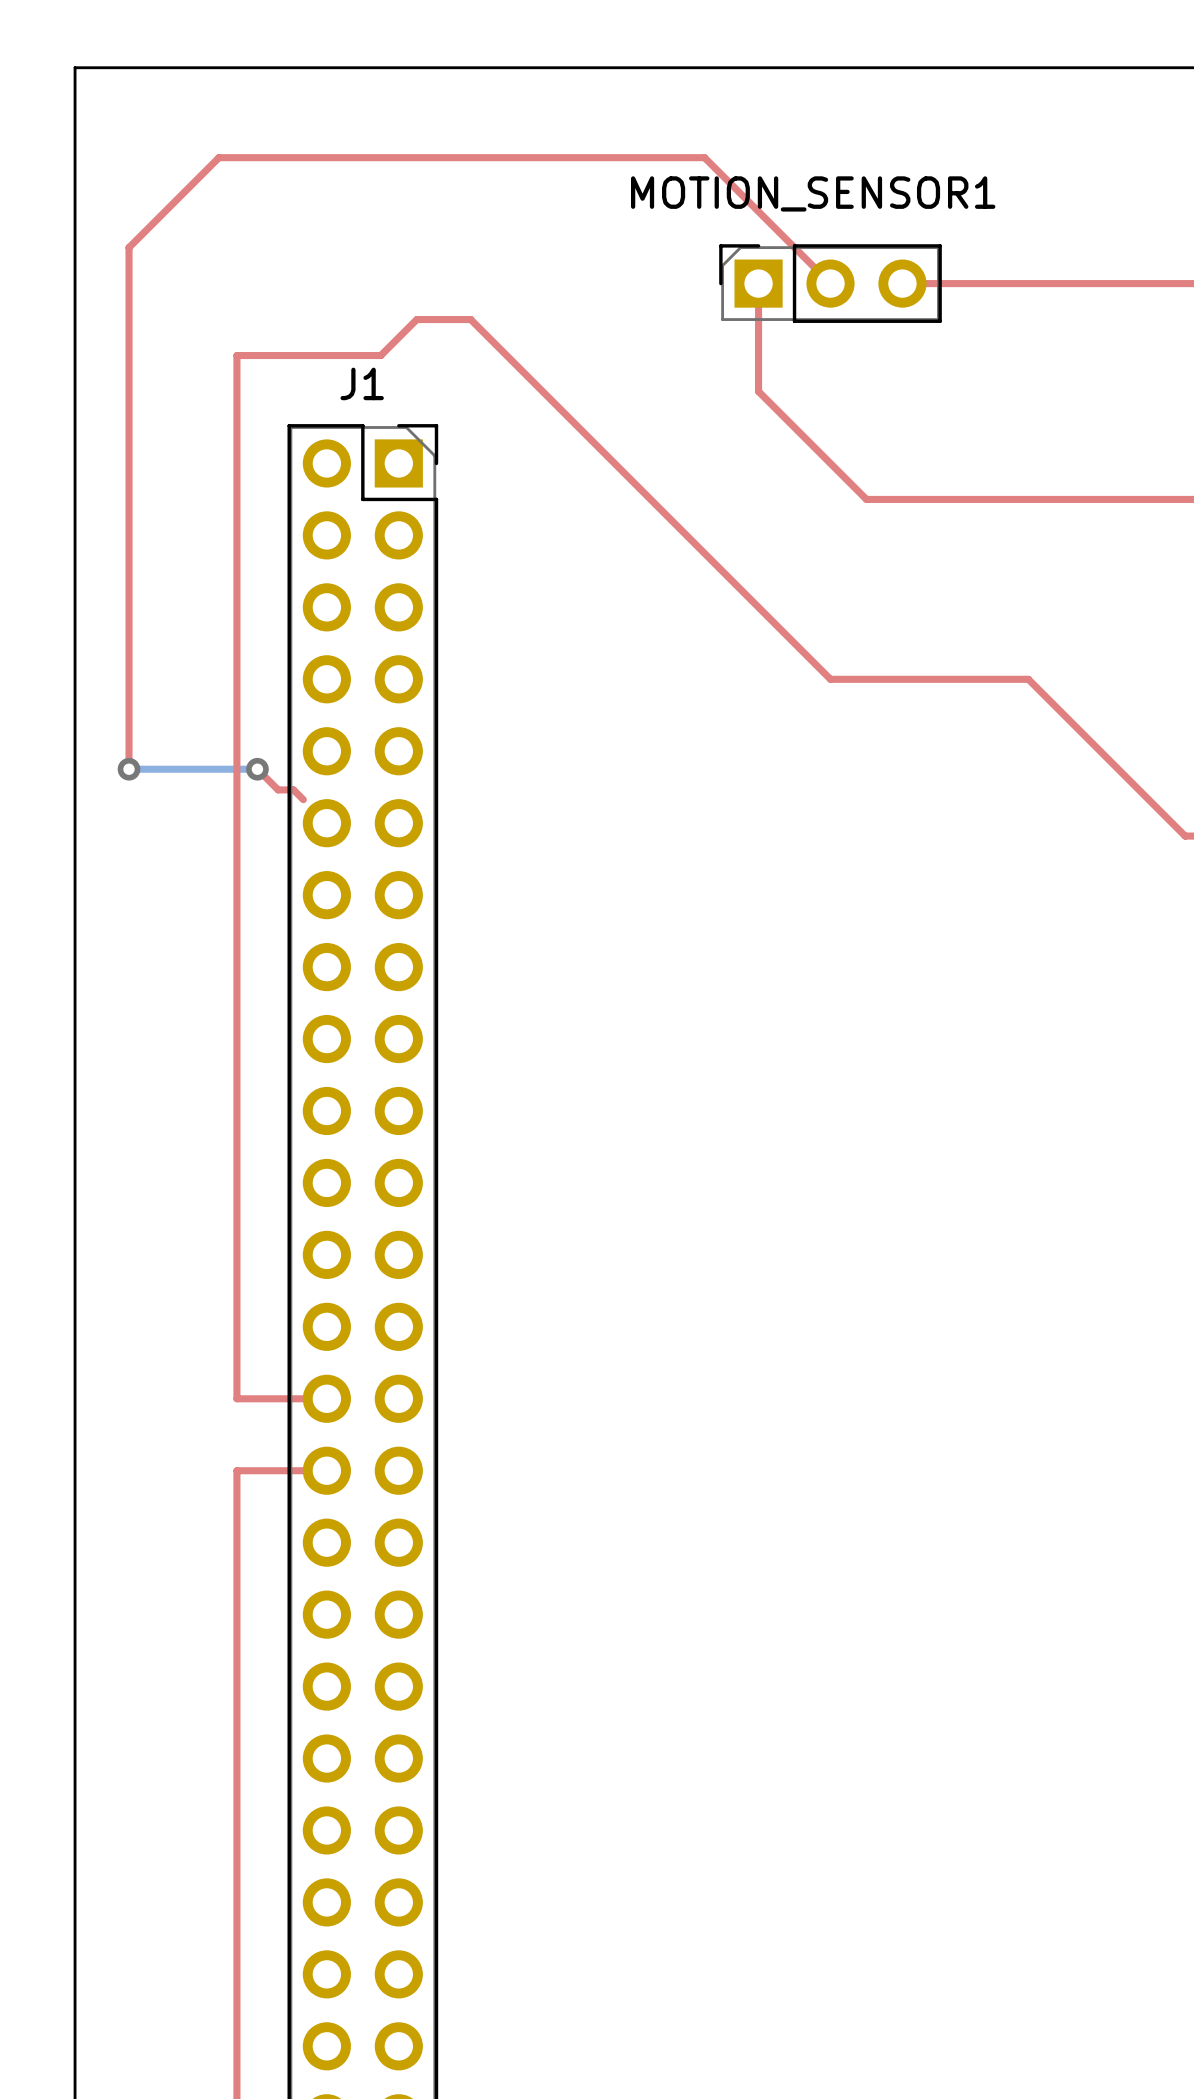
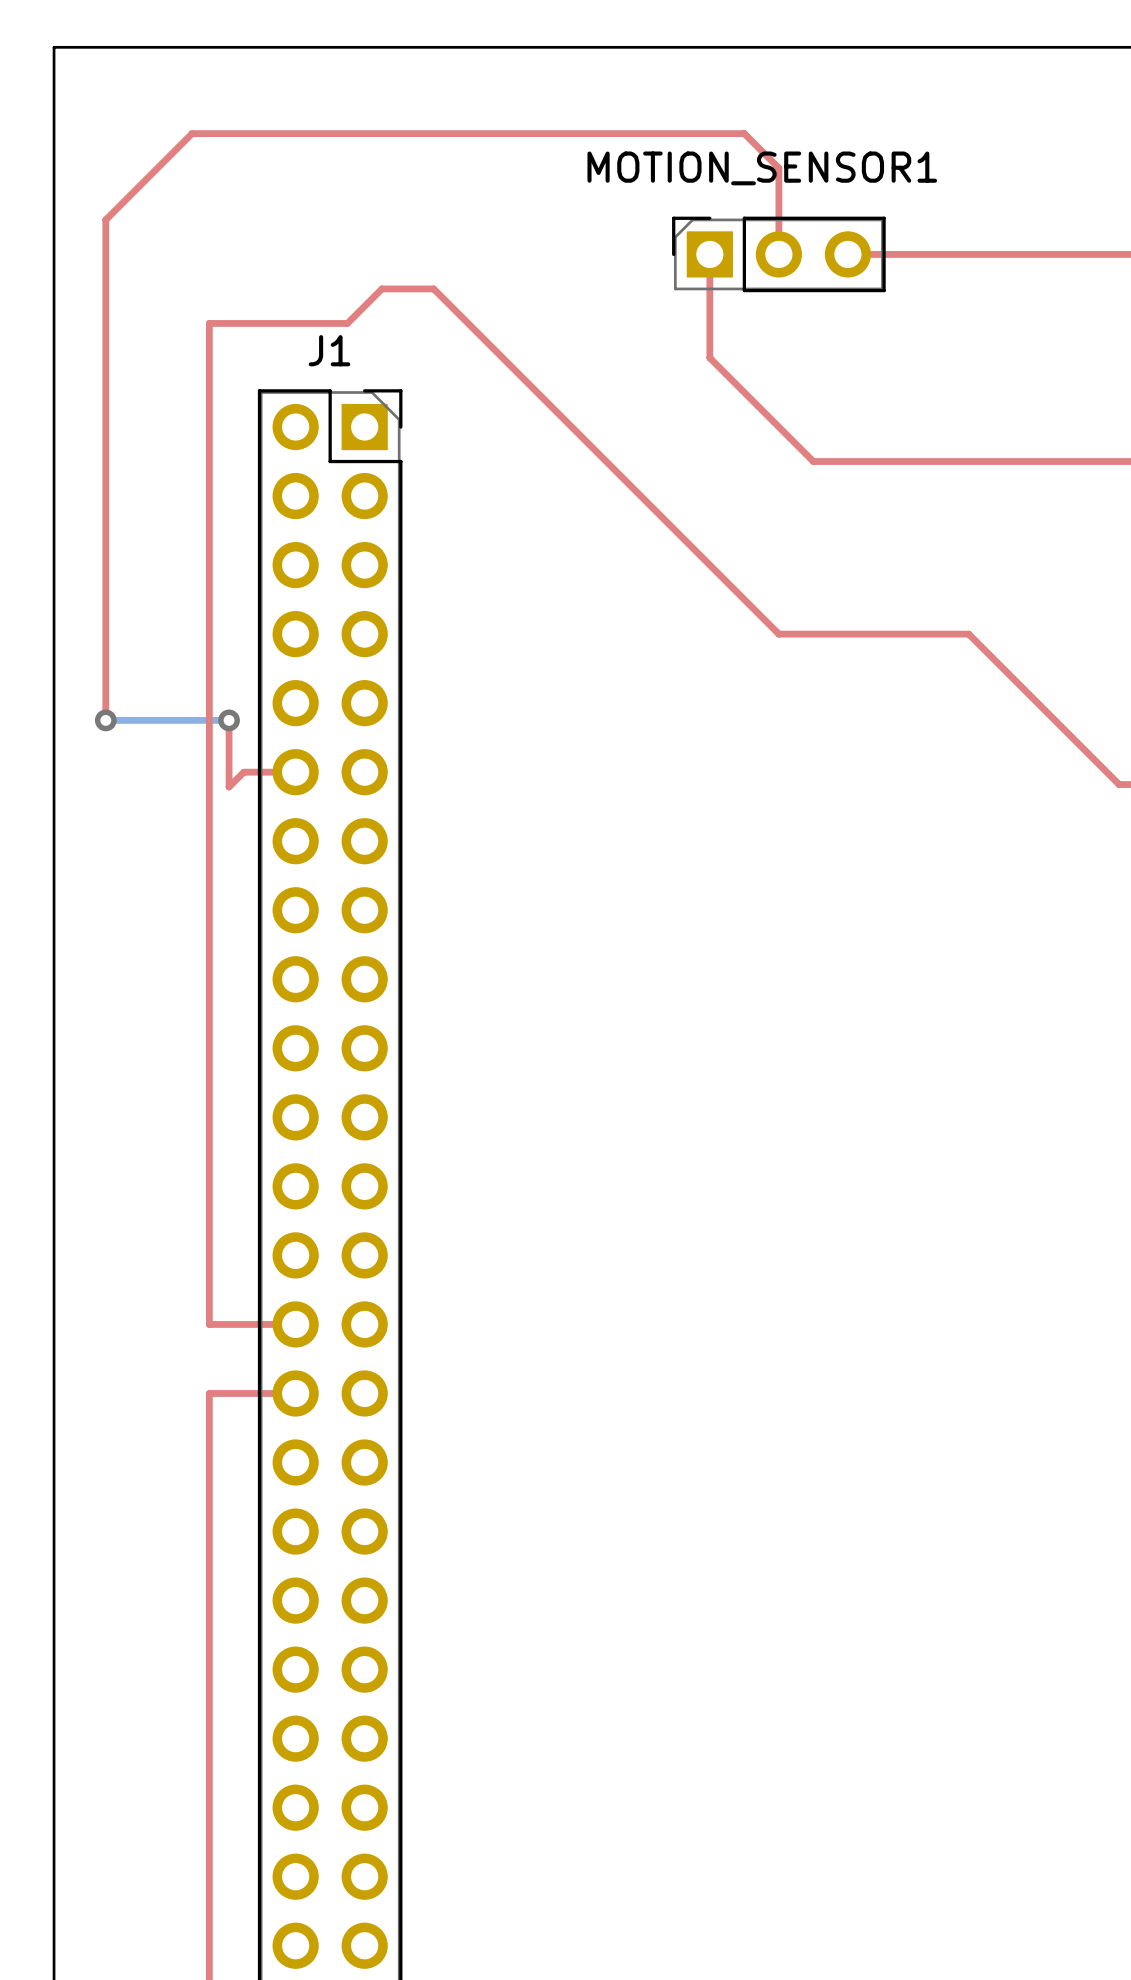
top track: (704, 157) (830, 283) -> (658, 133) (744, 133) (778, 168) (778, 254)
top track: (257, 769) (278, 789) (293, 789) (303, 799) -> (229, 720) (229, 787) (243, 772) (295, 772)

